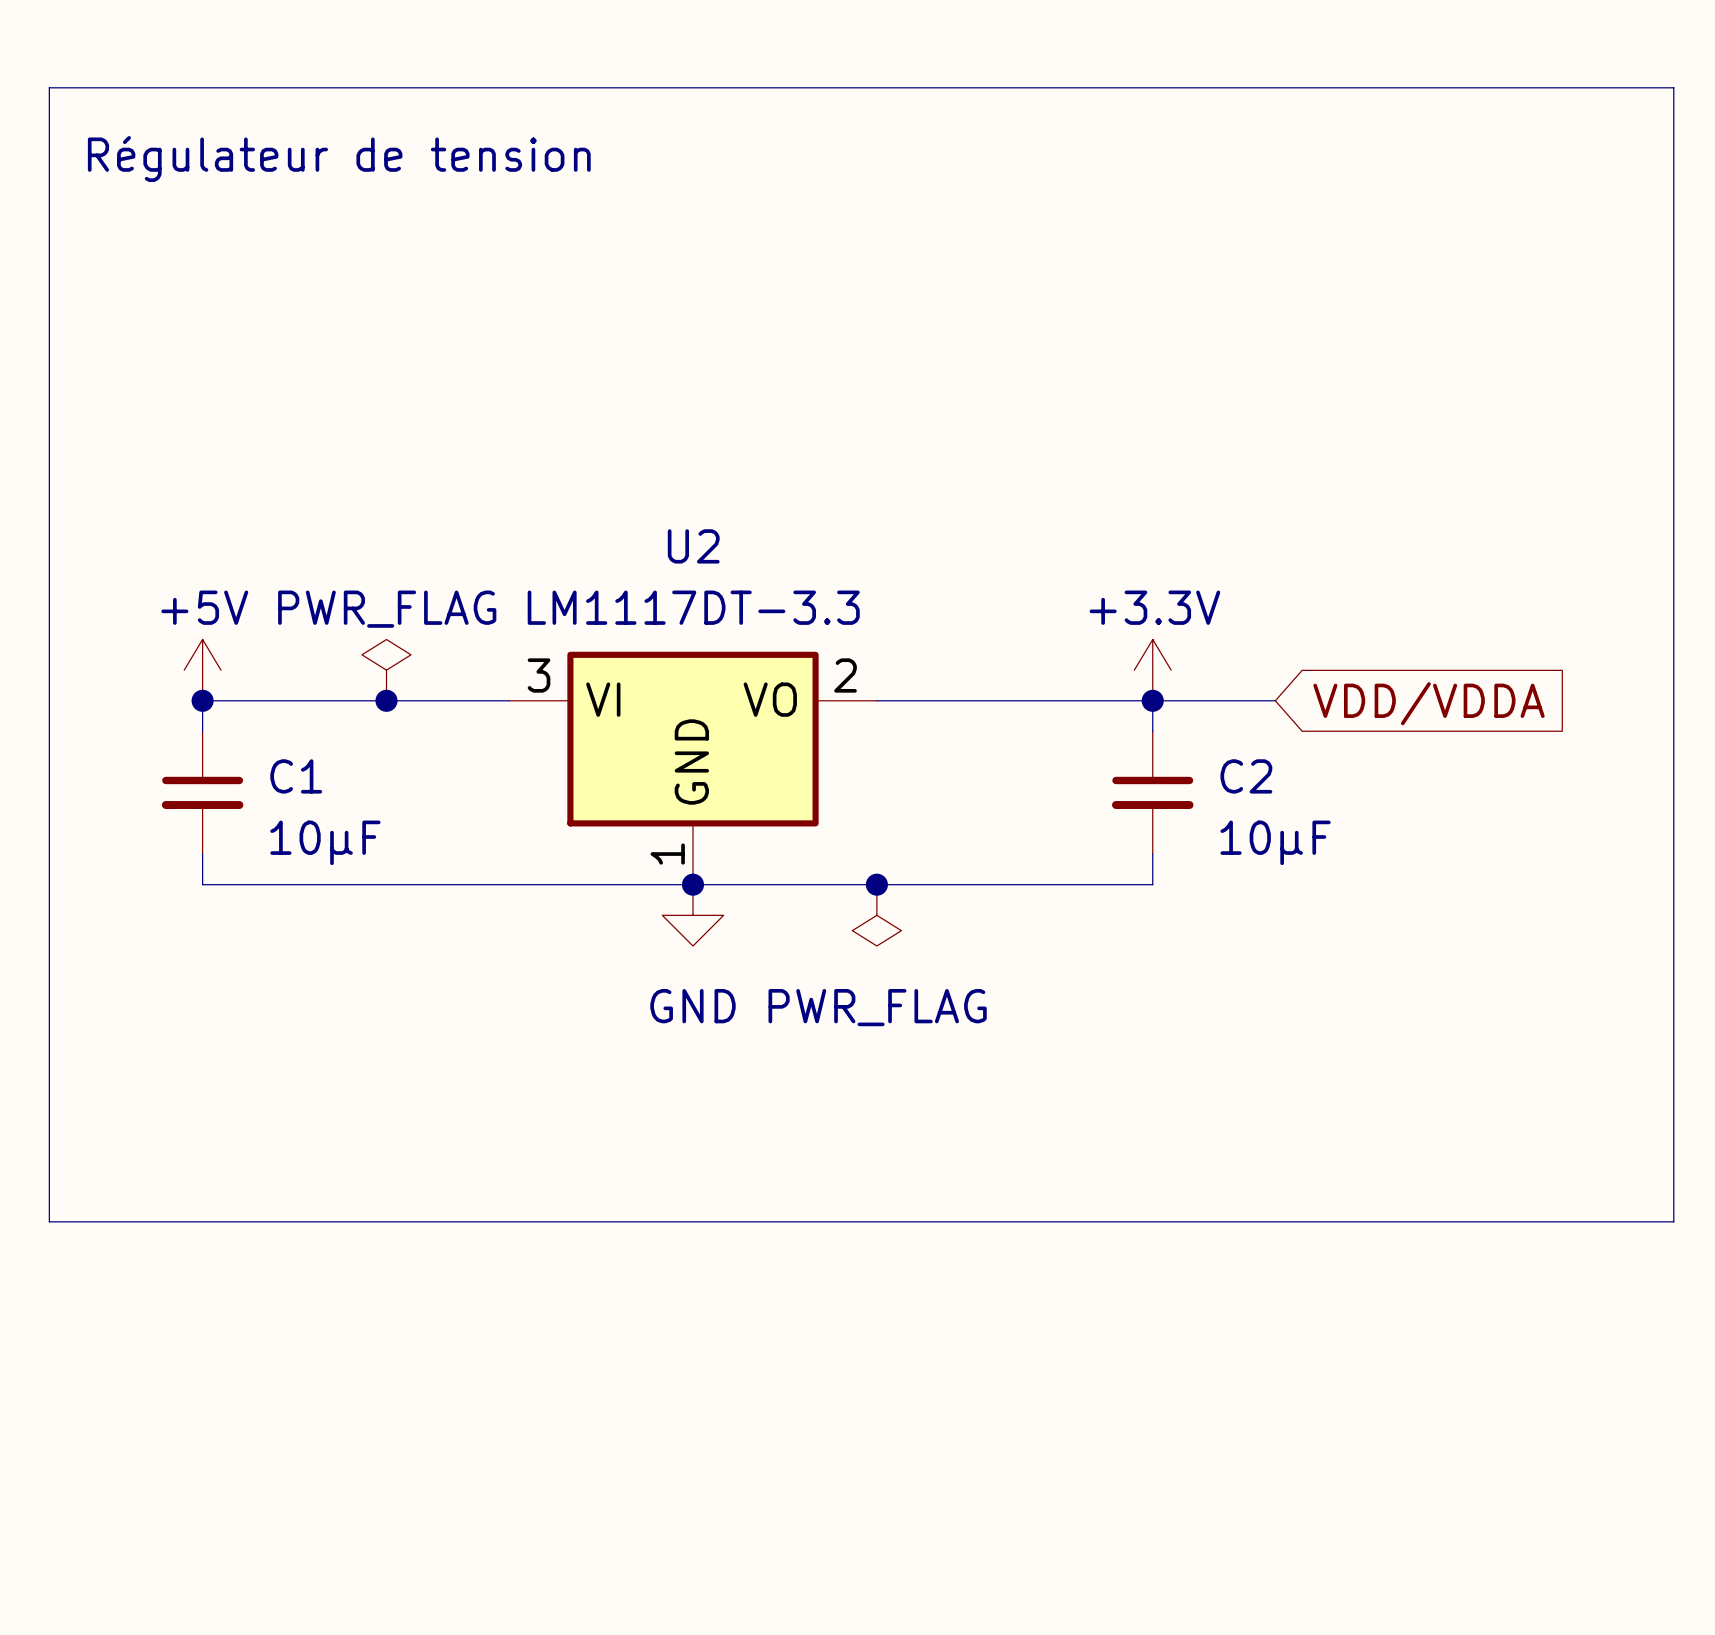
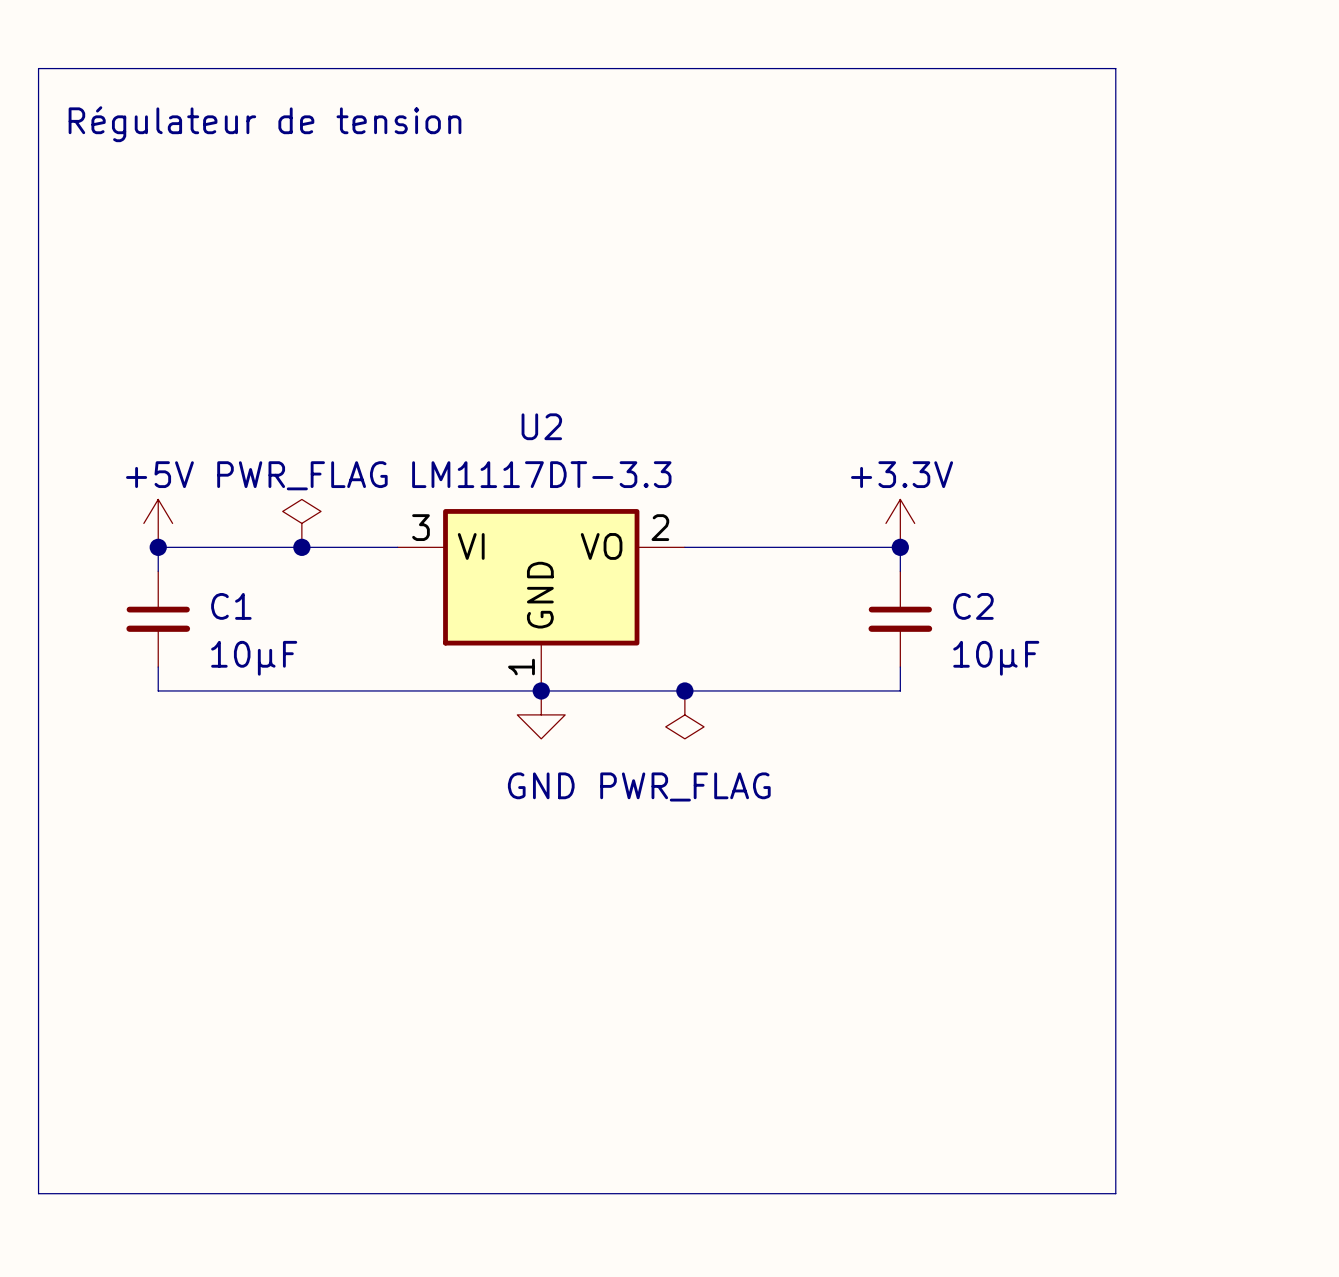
line: (1428, 87) (1673, 87) (1673, 1221) (49, 1221) -> (1115, 68) (1115, 1193) (38, 1193) (38, 954)
wire: (1152, 700) (1275, 700) -> none
global label: VDD/VDDA (1429, 703) -> none

